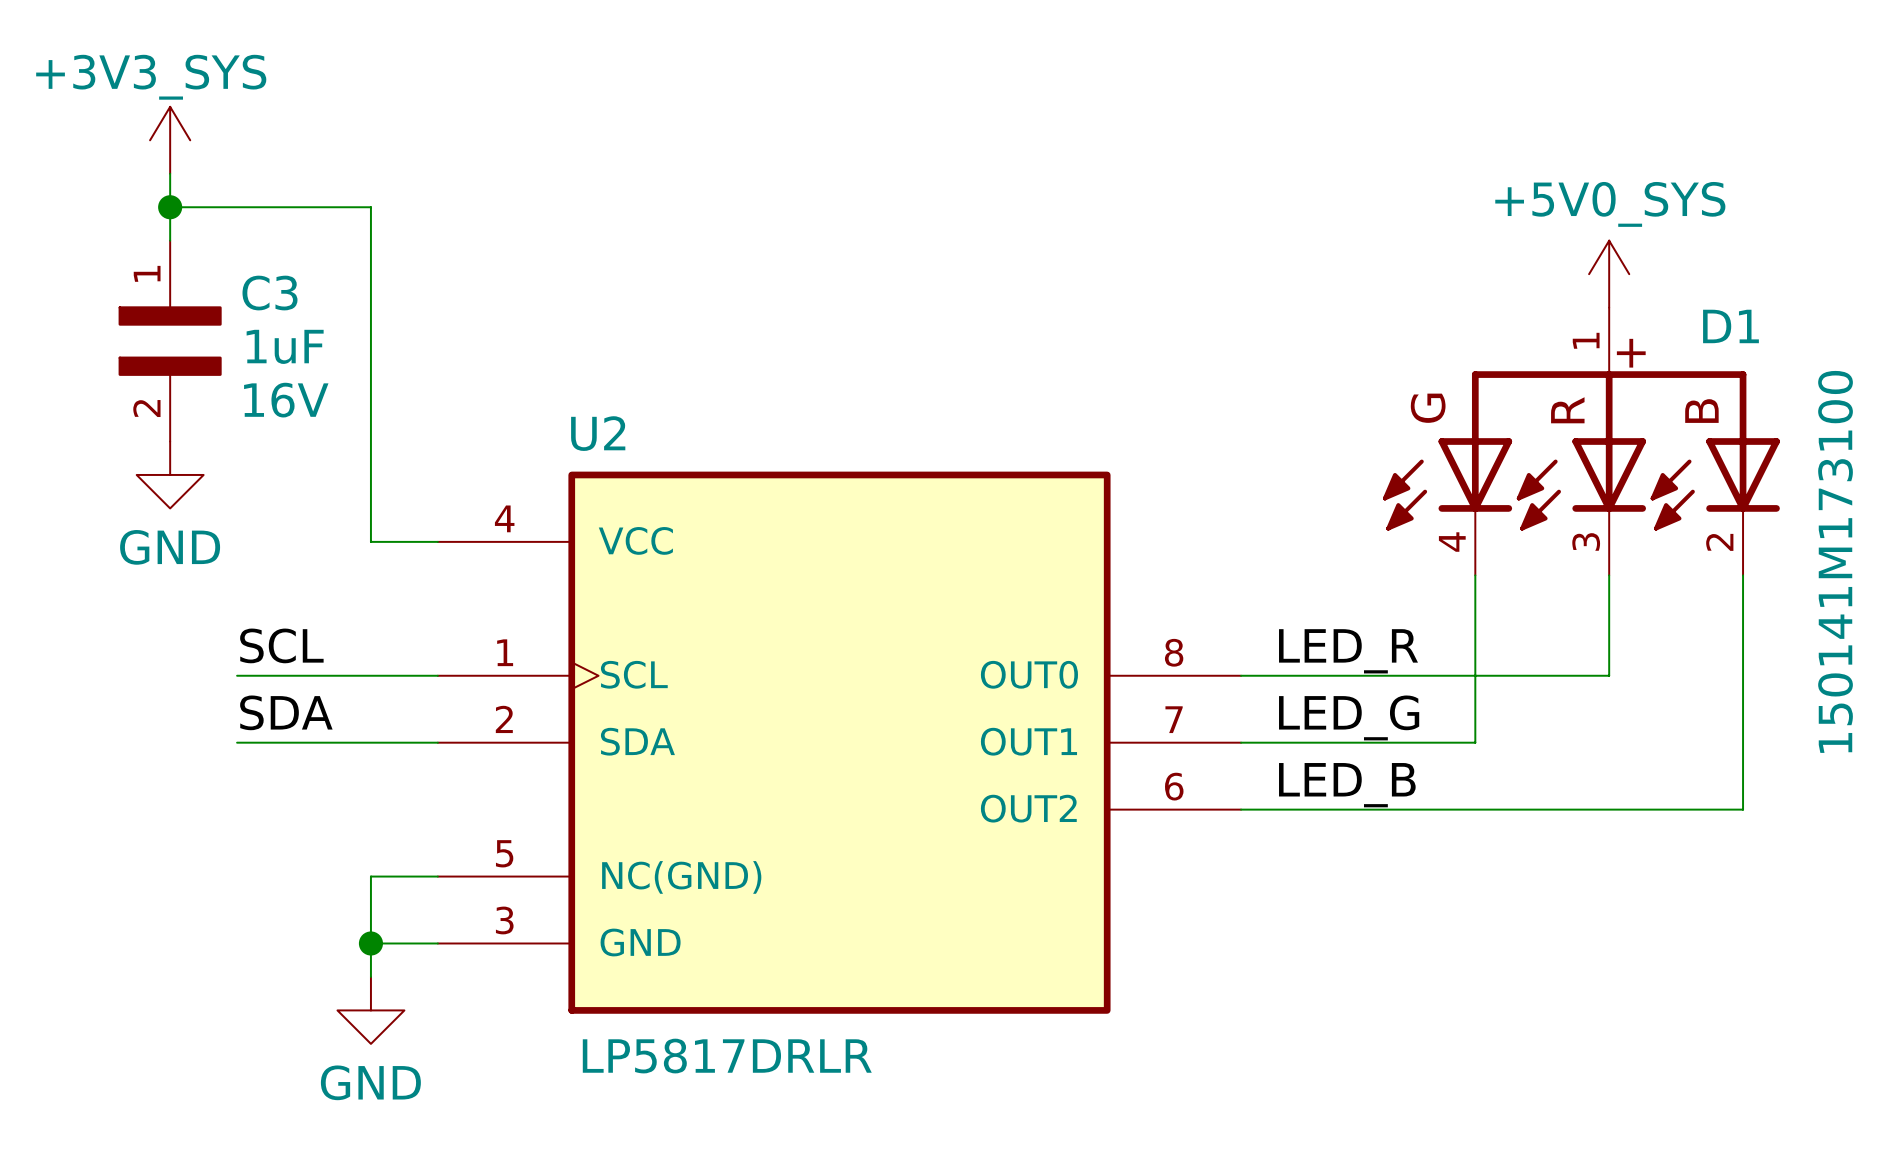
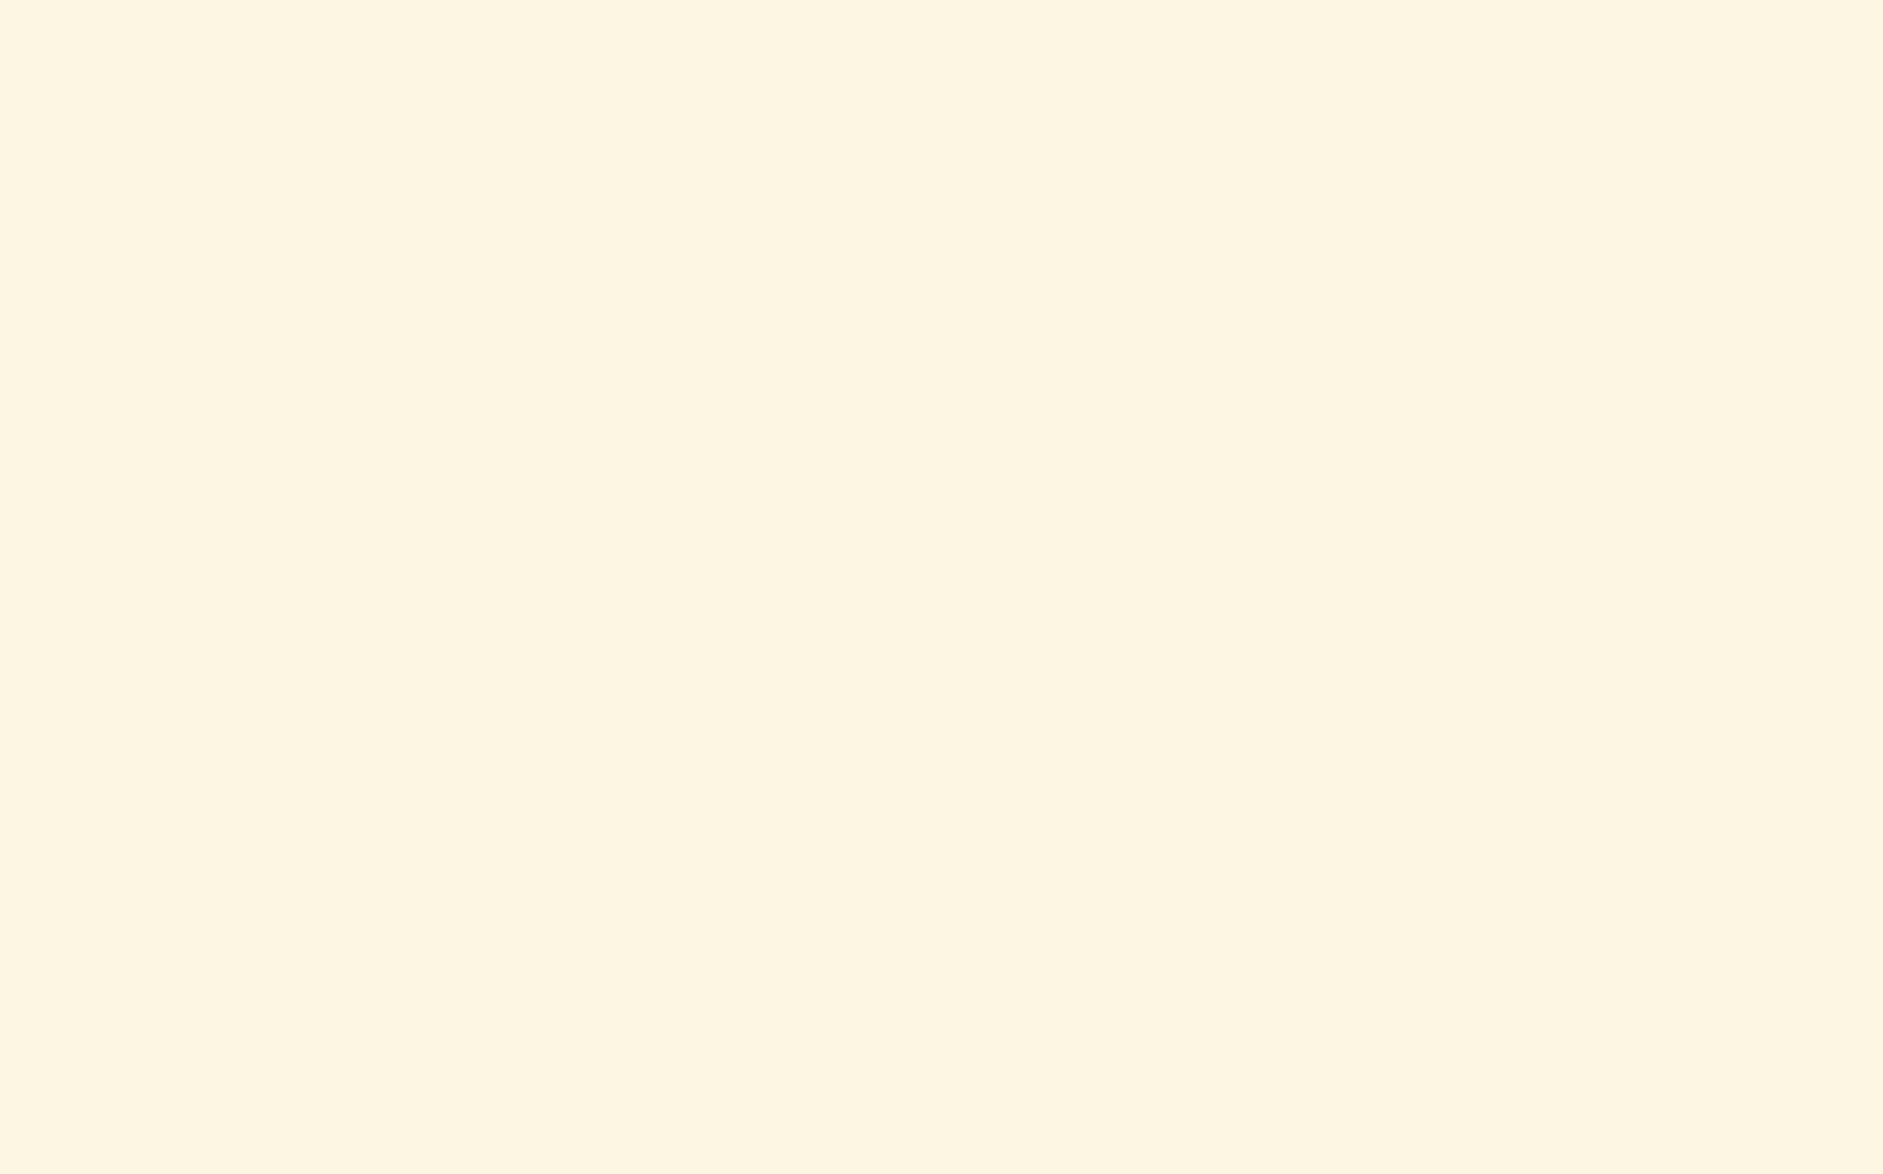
power symbol: +3V3_SYS (170, 140) -> none
wire: (170, 173) (170, 240) -> none
wire: (170, 207) (370, 207) (370, 541) (437, 541) -> none
junction: (170, 207) -> none
power symbol: +5V0_SYS (1609, 274) -> none
C3: 1uF (170, 341) -> none
D1: 150141M173100 (1581, 441) -> none
power symbol: GND (170, 474) -> none
wire: (1475, 575) (1475, 742) (1241, 742) -> none
wire: (1609, 575) (1609, 675) (1241, 675) -> none
wire: (1743, 575) (1743, 809) (1241, 809) -> none
label: SCL (281, 645) -> none
label: LED_R (1348, 651) -> none
wire: (237, 675) (437, 675) -> none
label: SDA (286, 712) -> none
label: LED_G (1349, 717) -> none
wire: (237, 742) (437, 742) -> none
U2: LP5817DRLR (839, 742) -> none
label: LED_B (1347, 785) -> none
wire: (437, 876) (370, 876) (370, 976) -> none
wire: (370, 943) (437, 943) -> none
junction: (370, 943) -> none
power symbol: GND (370, 1010) -> none

